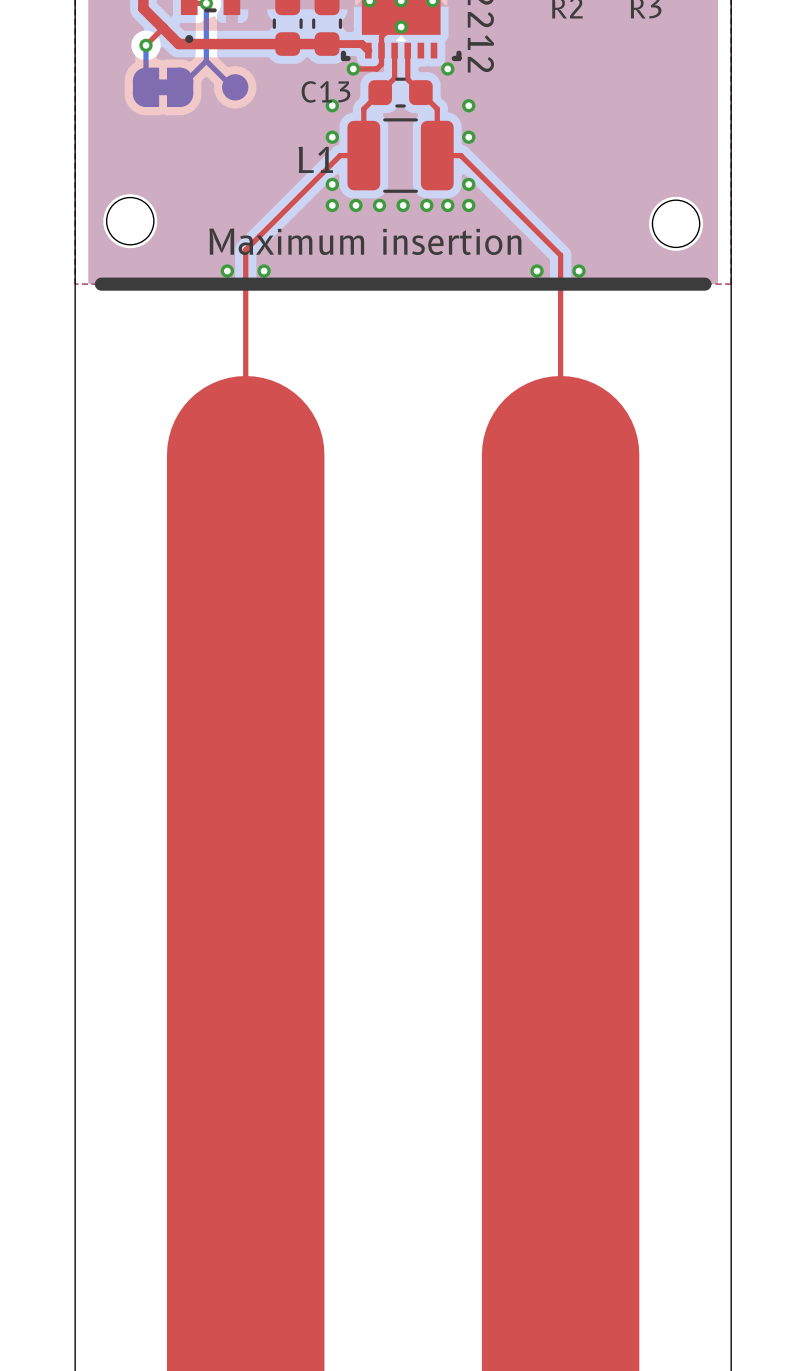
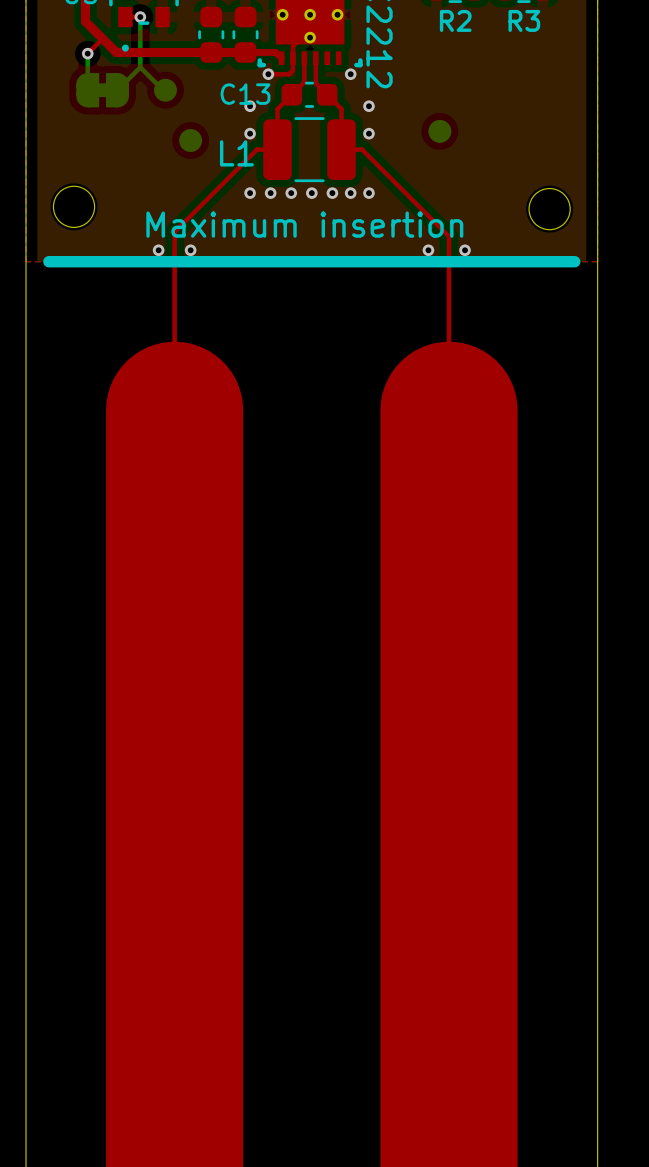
part: none -> (439, 131)
part: none -> (190, 140)
via: (332, 184) -> none
via: (468, 184) -> none

